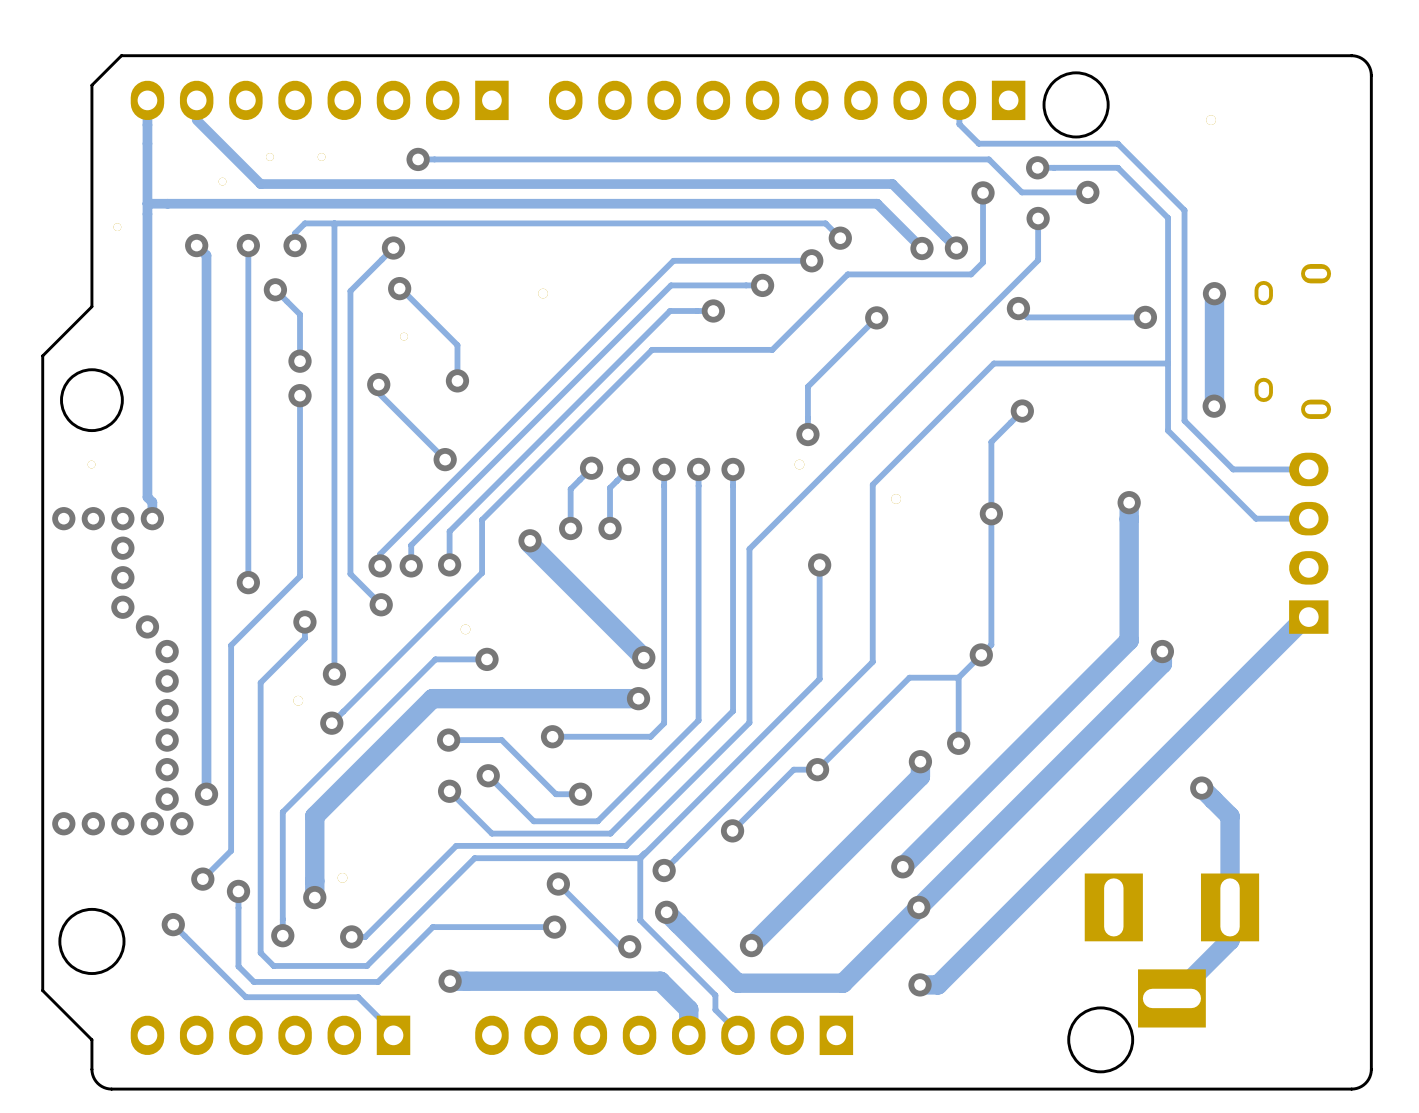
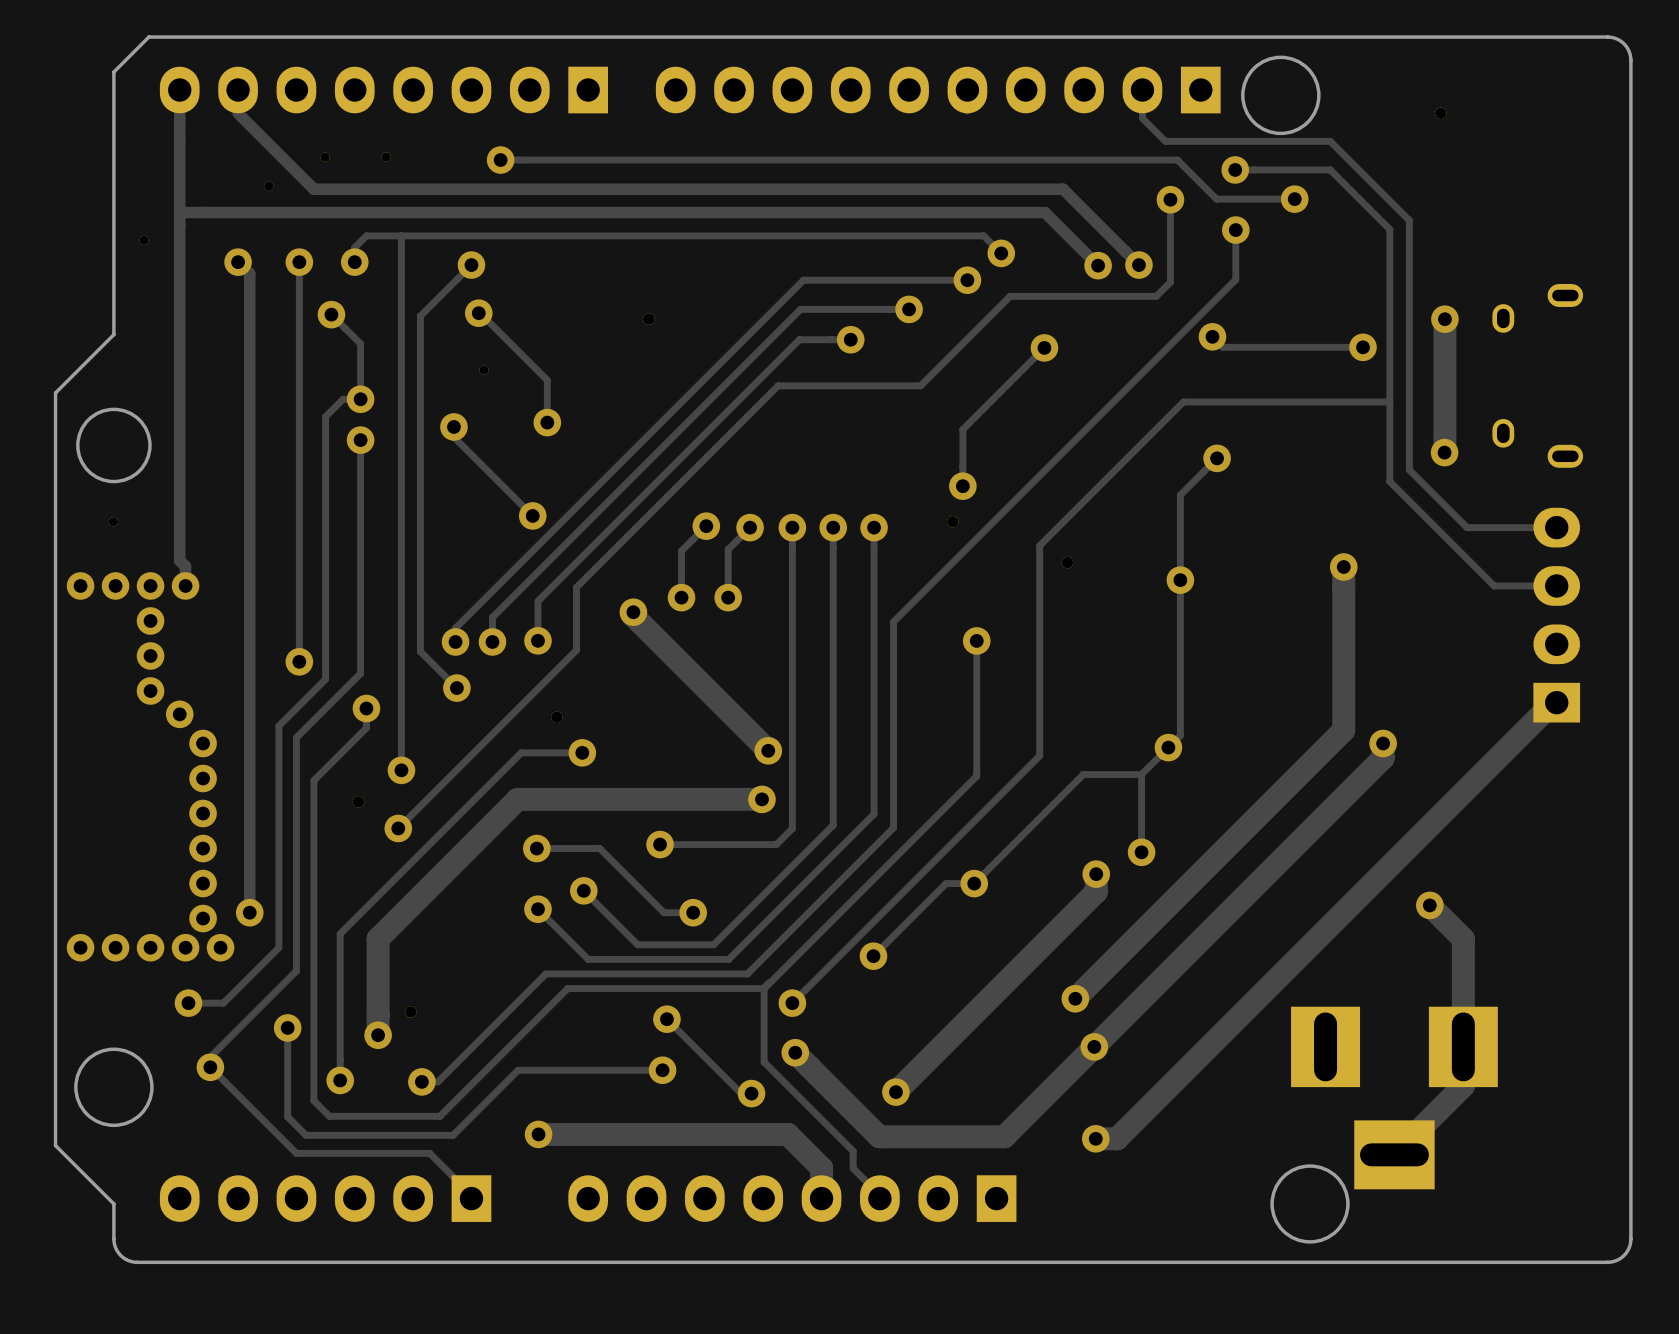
track: (300, 576) (231, 645) -> (360, 399) (343, 399) (325, 416) (325, 679) (278, 726) (278, 736)
track: none -> (360, 654) (360, 673) (296, 737) (296, 971) (210, 1057) (210, 1067)
track: (231, 823) (231, 850) (202, 879) -> (278, 947) (223, 1003) (188, 1003)
via position: (202, 879) -> (188, 1003)

